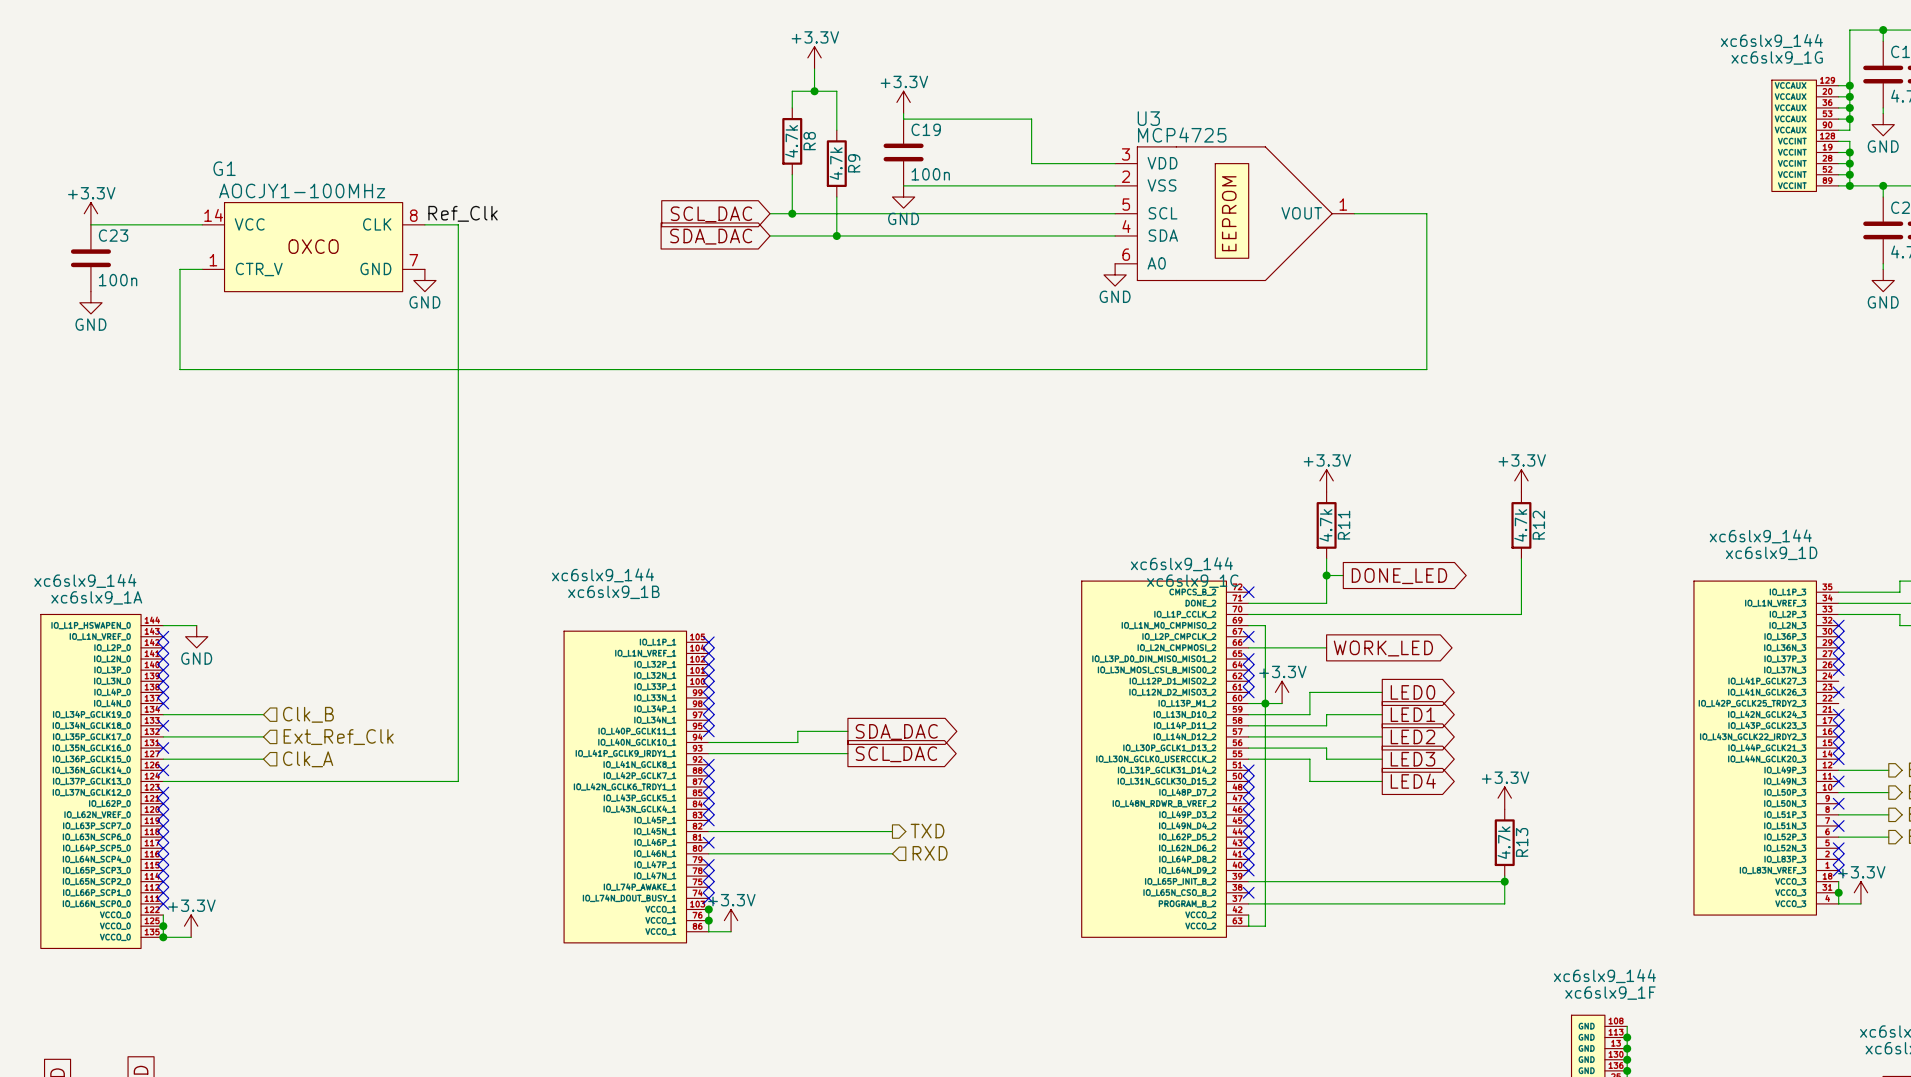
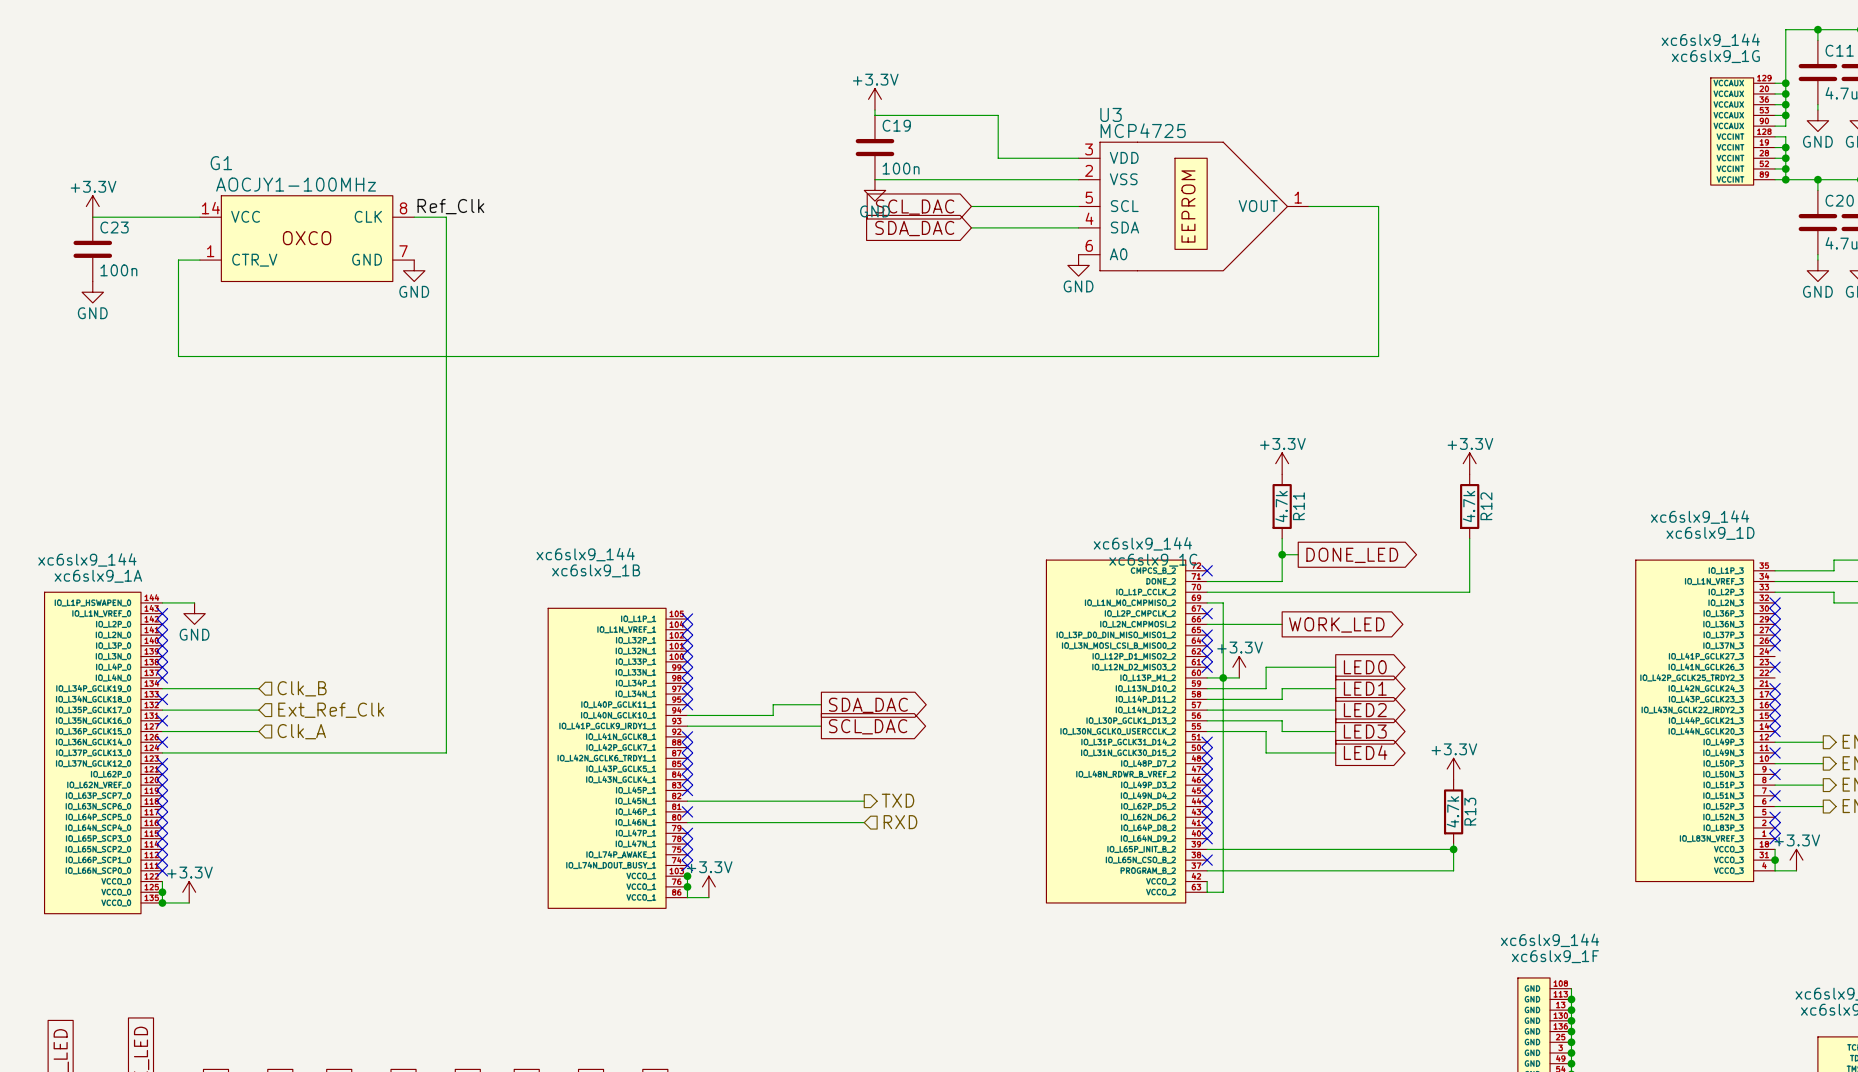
power symbol: +3.3V (814, 57) -> none
wire: (814, 69) (814, 91) -> none
junction: (814, 91) -> none
wire: (792, 107) (792, 91) (836, 91) (836, 130) -> none
R8: 4.7k (792, 141) -> none
R9: 4.7k (836, 163) -> none
wire: (792, 174) (792, 213) -> none
wire: (836, 197) (836, 235) -> none
wire: (770, 213) (1003, 213) -> none
junction: (792, 213) -> none
global label: SCL_DAC (711, 214) -> none
global label: none -> SCL_DAC (915, 207)
wire: (770, 235) (1003, 235) -> none
junction: (836, 235) -> none
global label: SDA_DAC (711, 236) -> none
global label: none -> SDA_DAC (914, 228)

